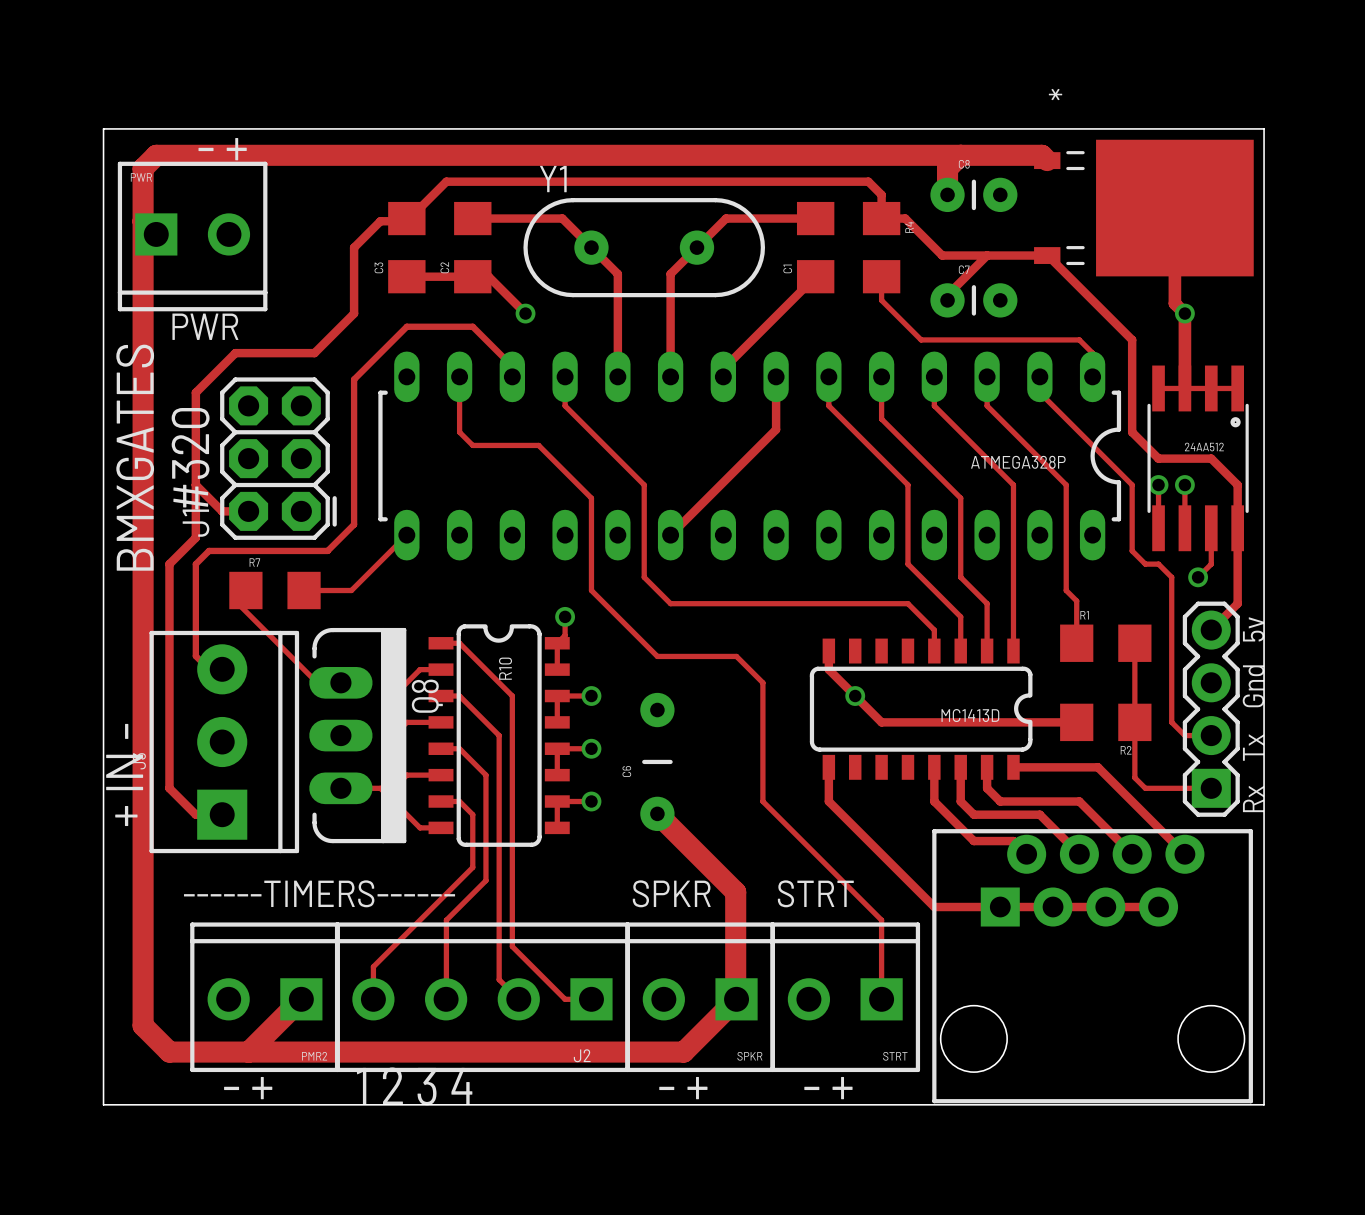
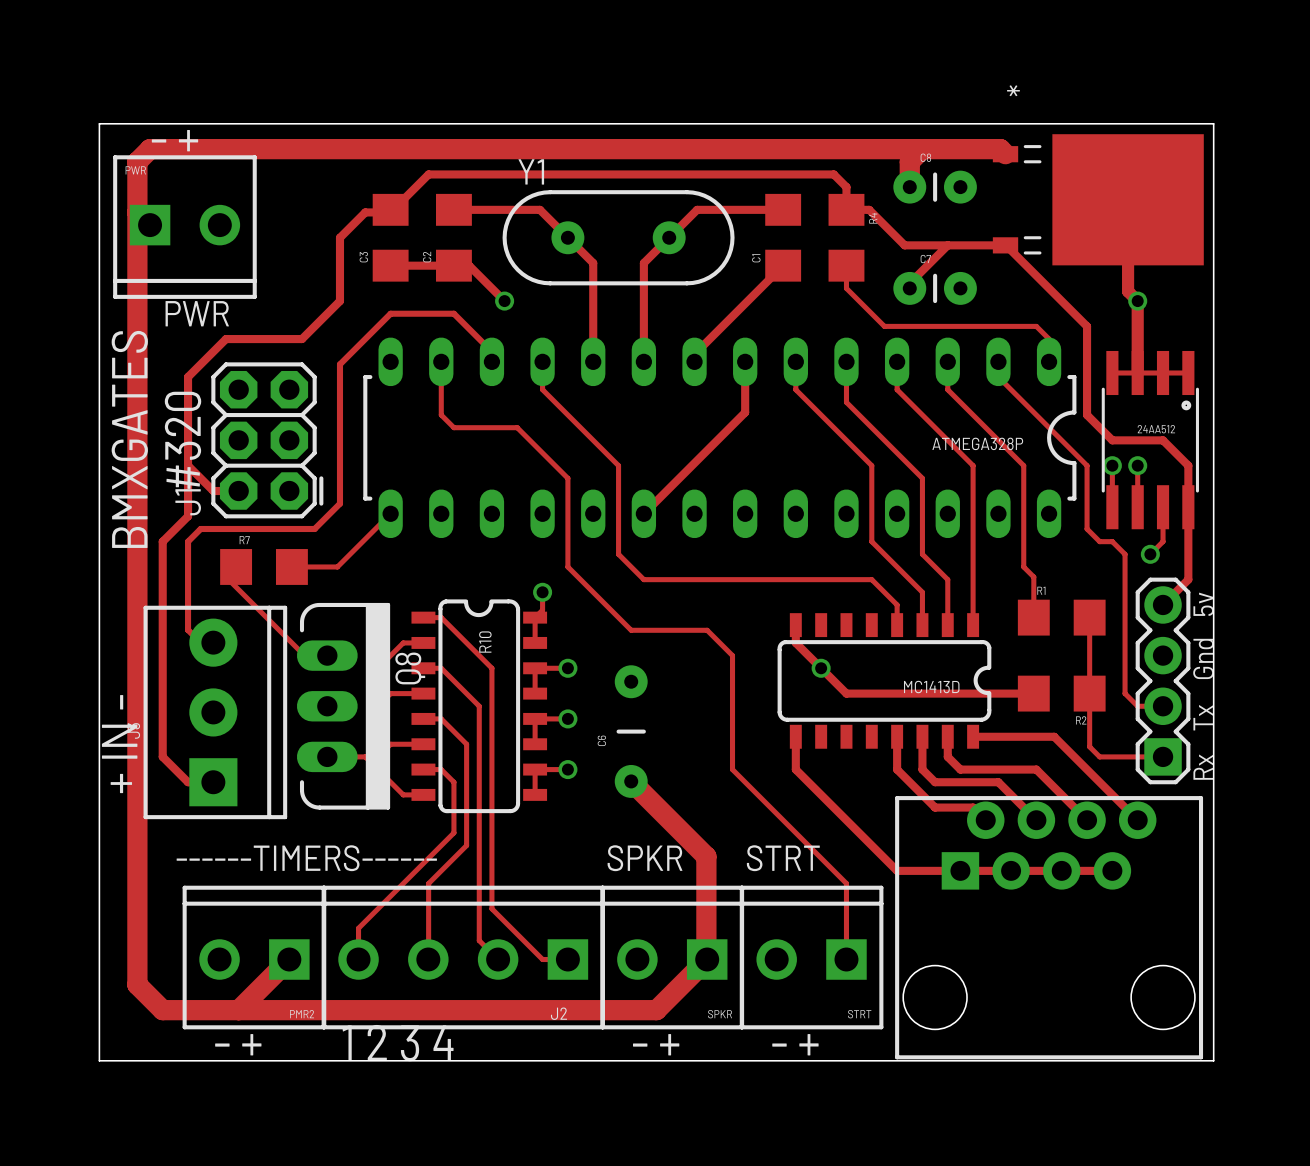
text position: - + (222, 149) -> - + (174, 140)

